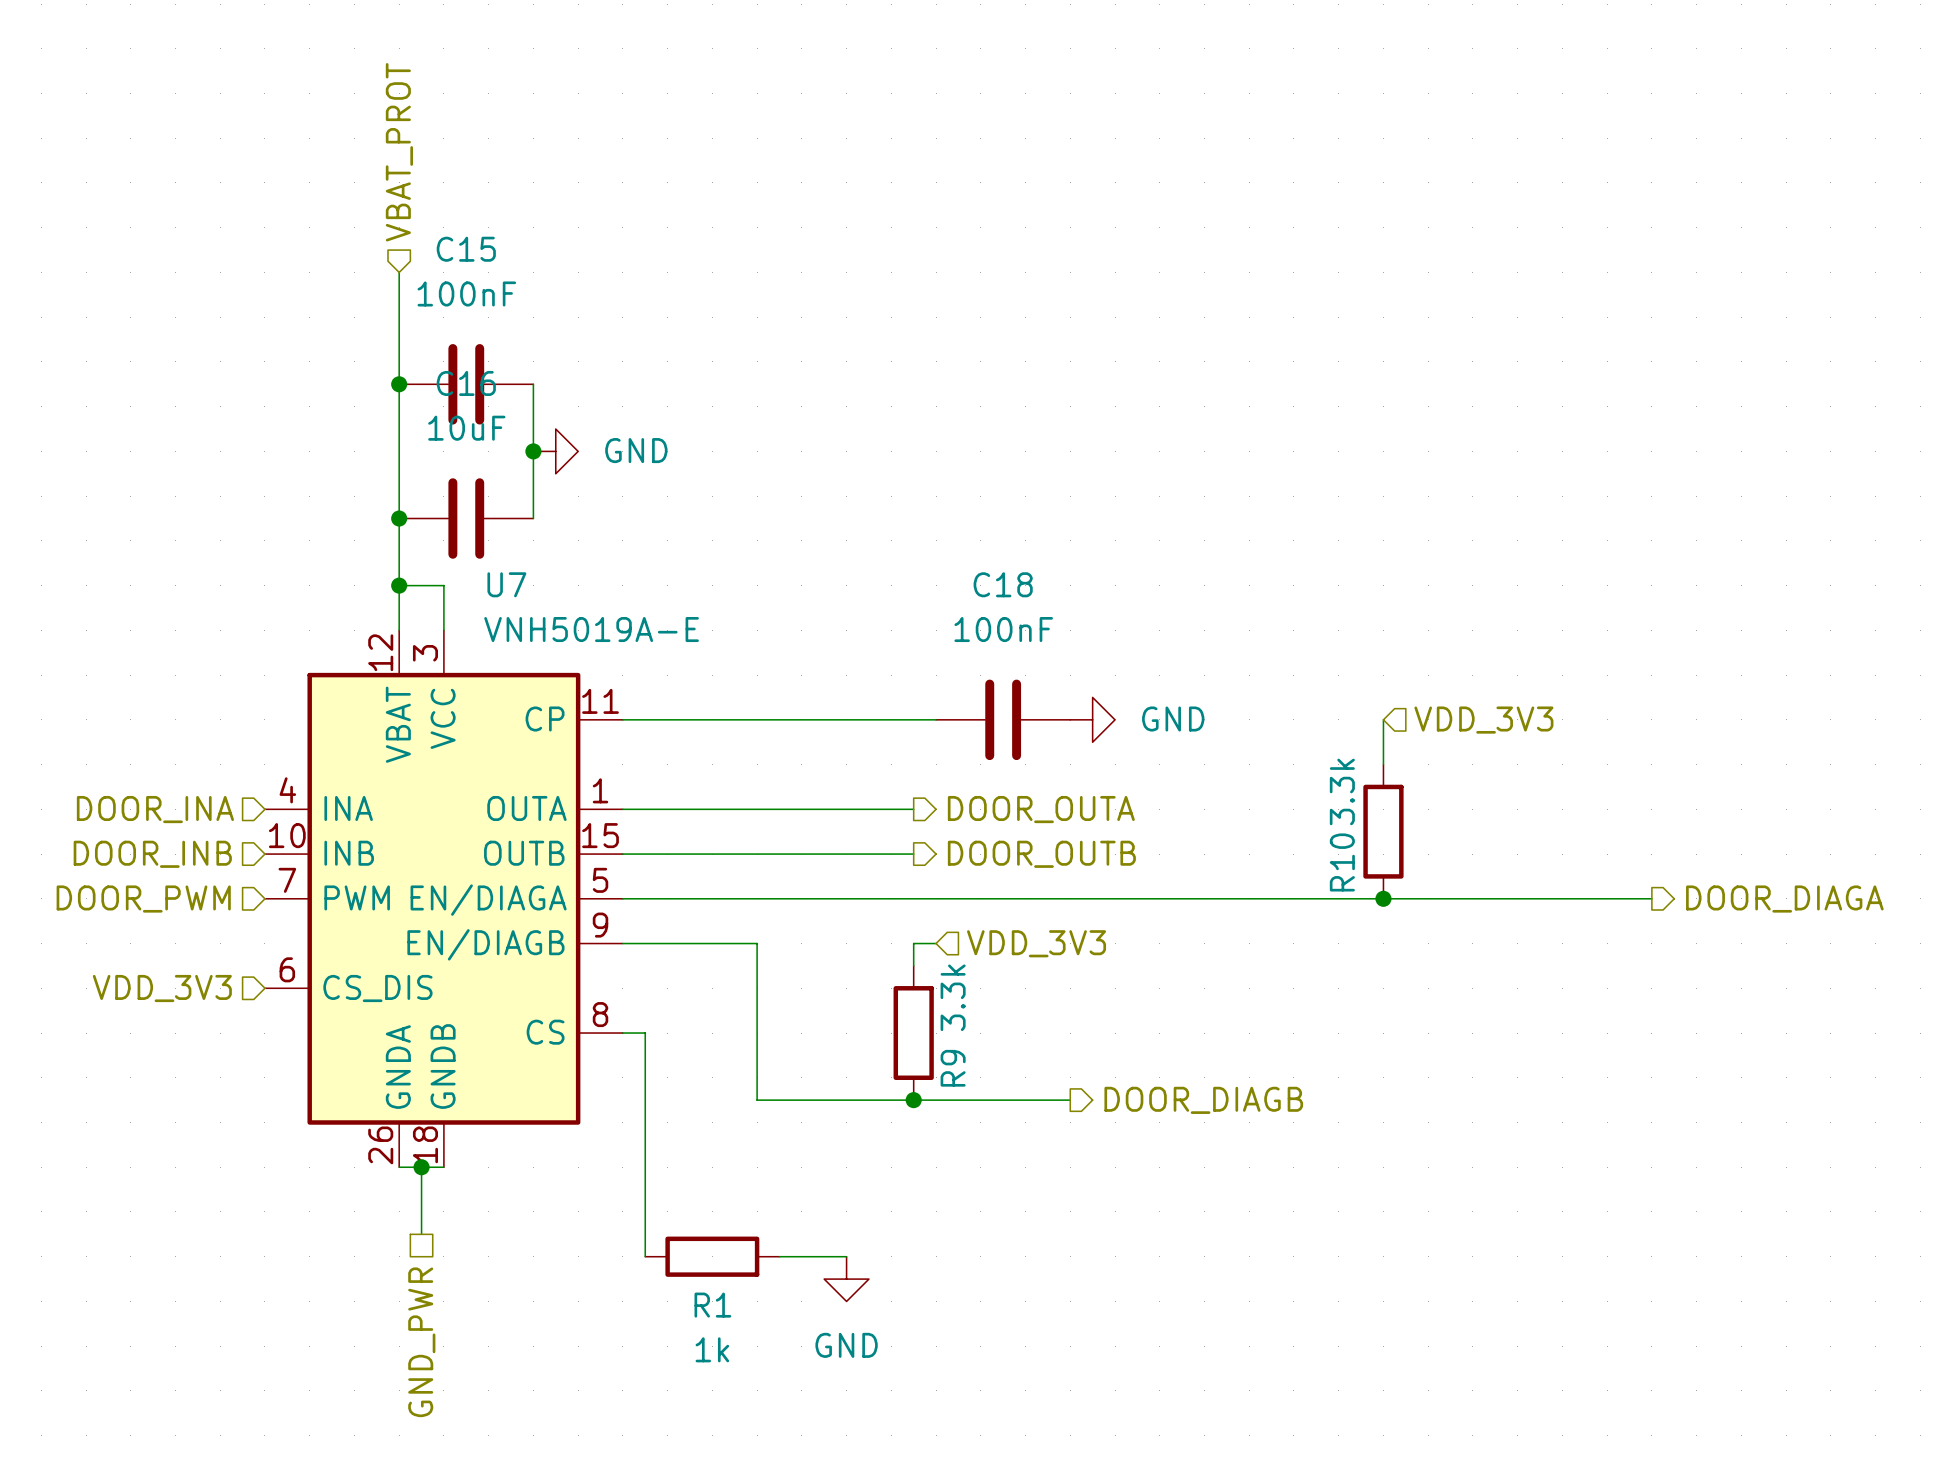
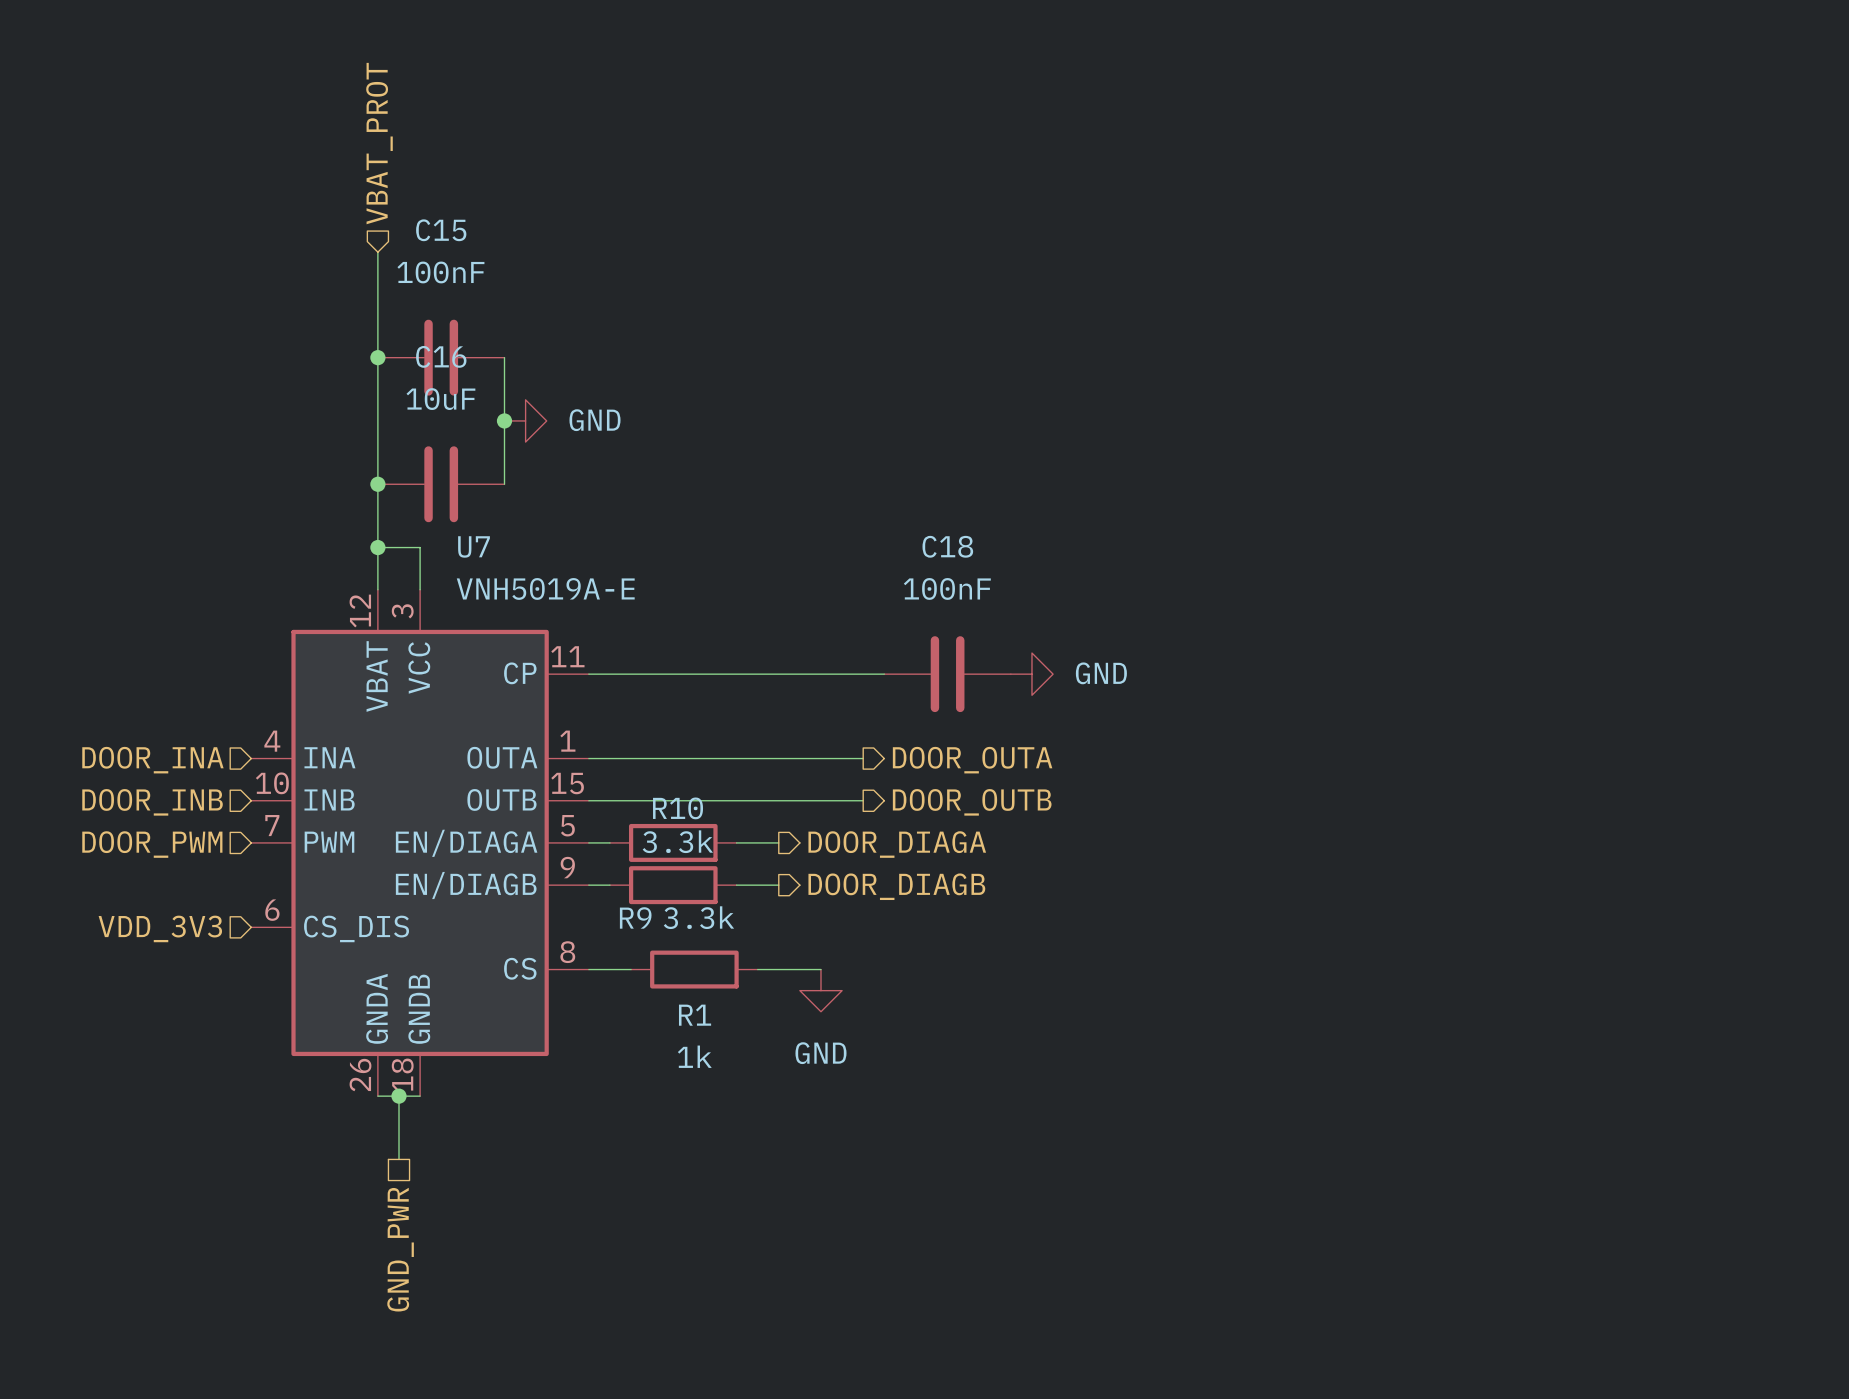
wire: (1383, 719) (1383, 764) -> none
hierarchical label: VDD_3V3 (1483, 720) -> none
R10 value position: 3.3k (1342, 791) -> 3.3k (677, 841)
R10 rotation: 0° (1383, 831) -> 90° clockwise (673, 842)
R10 position: (1383, 831) -> (673, 842)
R10 name position: R10 (1342, 862) -> R10 (678, 808)
wire: (645, 898) (779, 898) -> none
wire: (824, 898) (1651, 898) -> none
junction: (1383, 898) -> none
hierarchical label: none -> DOOR_DIAGA (897, 844)
hierarchical label: DOOR_DIAGA (1784, 899) -> none
wire: (645, 943) (757, 943) (757, 1100) (1070, 1100) -> none
wire: none -> (736, 885) (778, 885)
wire: (936, 943) (913, 943) (913, 965) -> none
hierarchical label: VDD_3V3 (1036, 943) -> none
wire: (645, 1033) (645, 1256) -> (609, 969) (631, 969)
R9 rotation: 0° (913, 1033) -> 90° clockwise (673, 885)
R9 position: (913, 1033) -> (673, 885)
junction: (913, 1100) -> none
hierarchical label position: DOOR_DIAGB (1203, 1100) -> DOOR_DIAGB (896, 886)
R1 position: (712, 1256) -> (694, 969)
wire: (779, 1256) (846, 1256) -> (757, 969) (820, 969)
power symbol position: GND (846, 1279) -> GND (820, 990)

